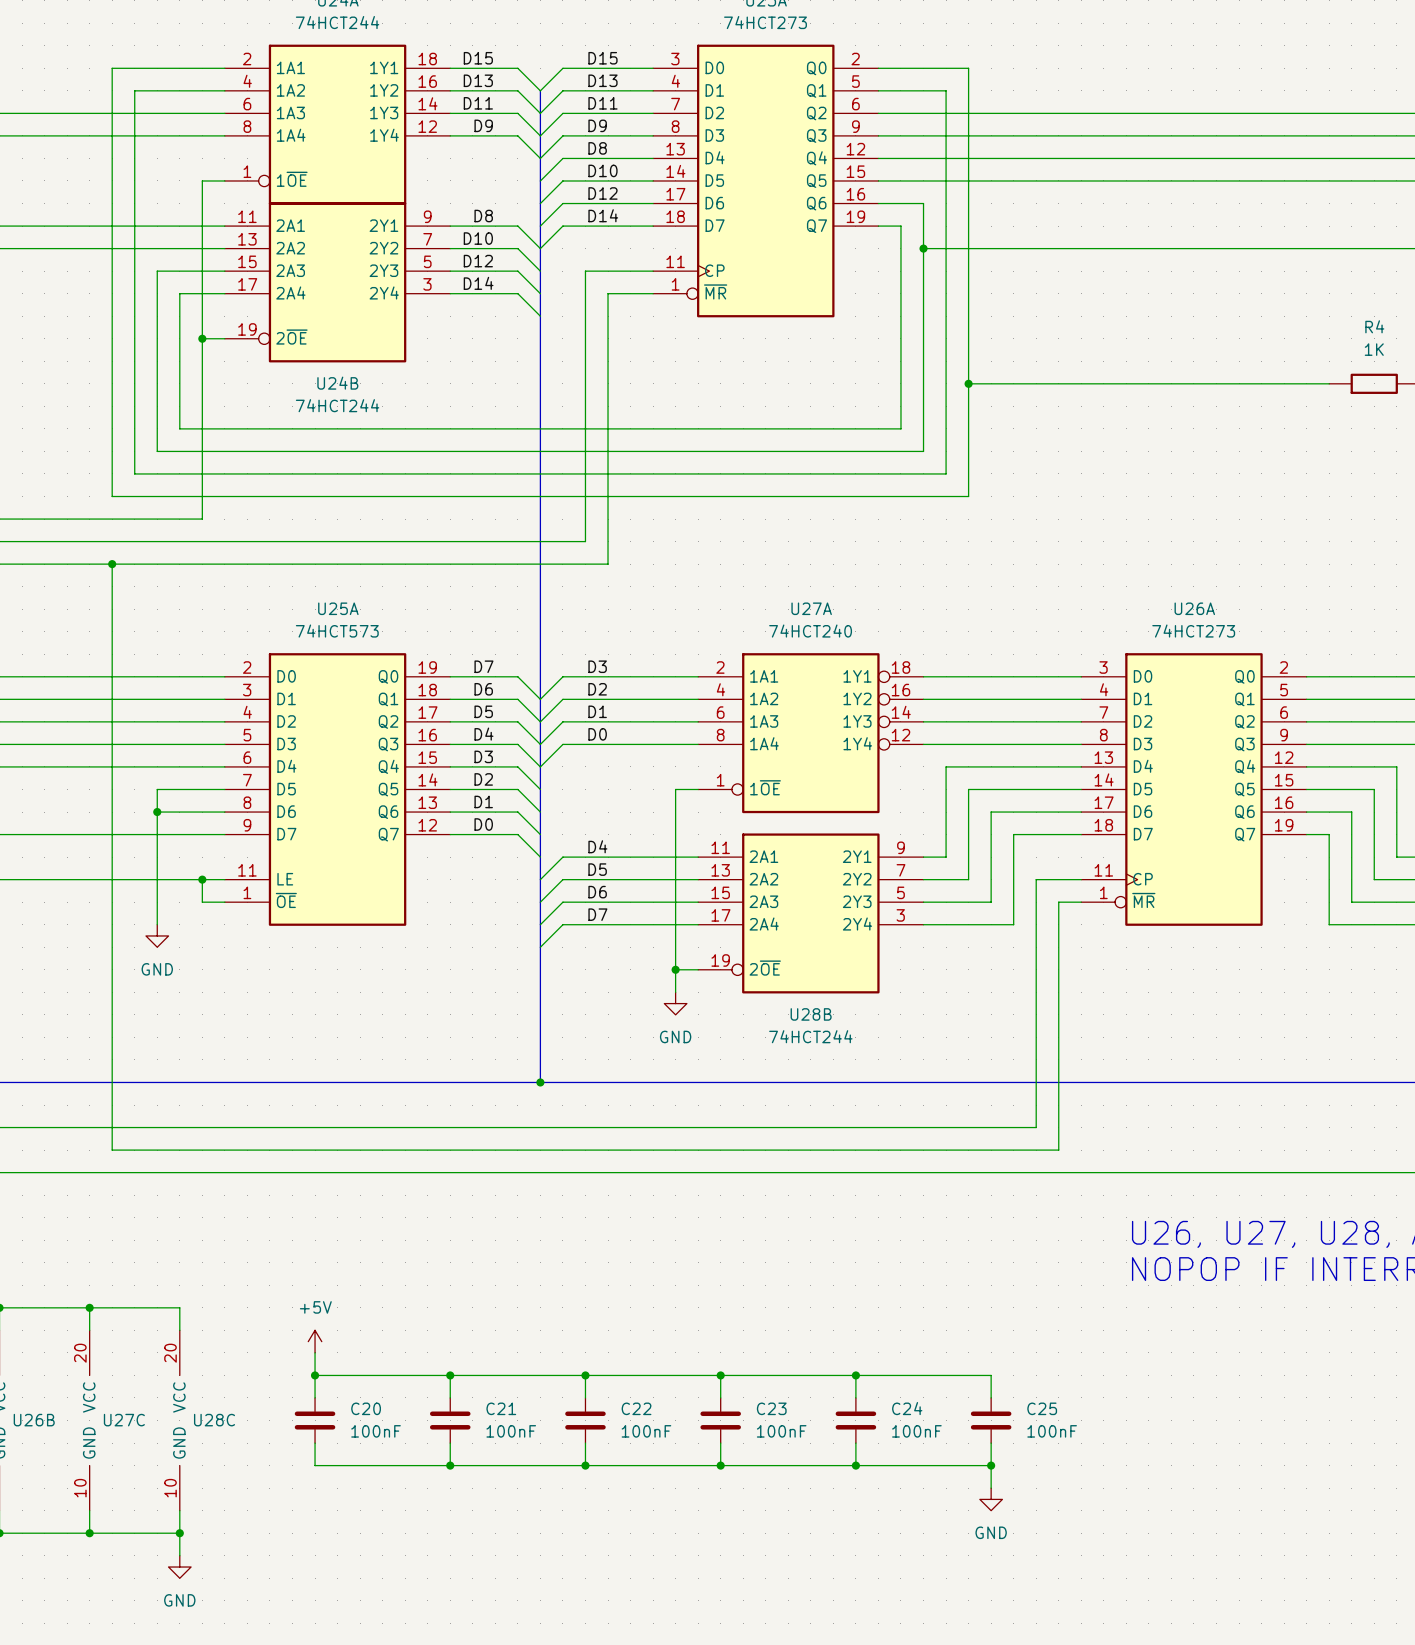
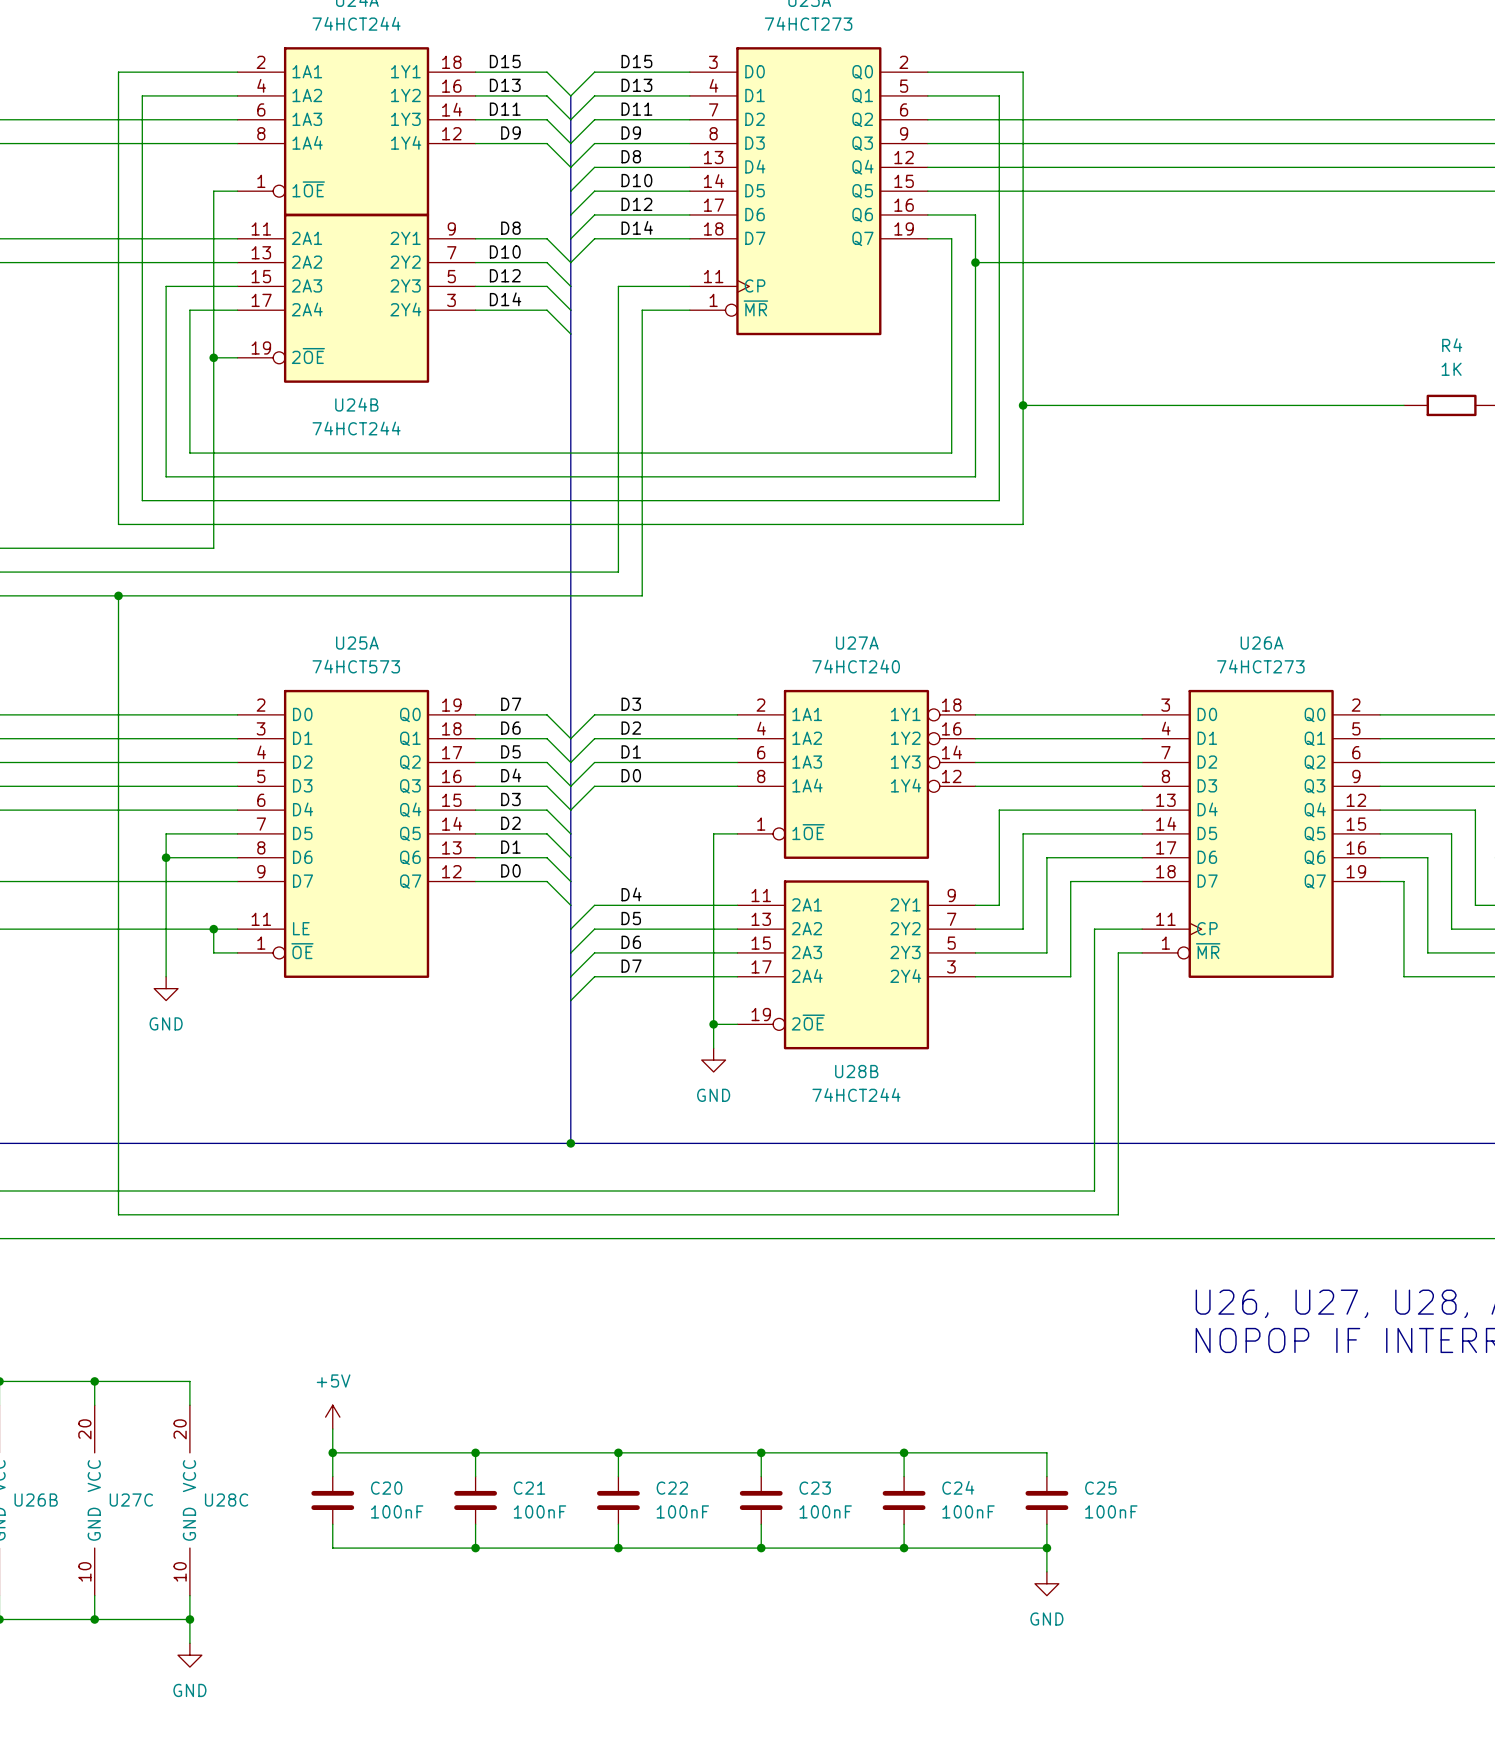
U25A symbol: [224, 653, 451, 926] -> [237, 689, 476, 978]

